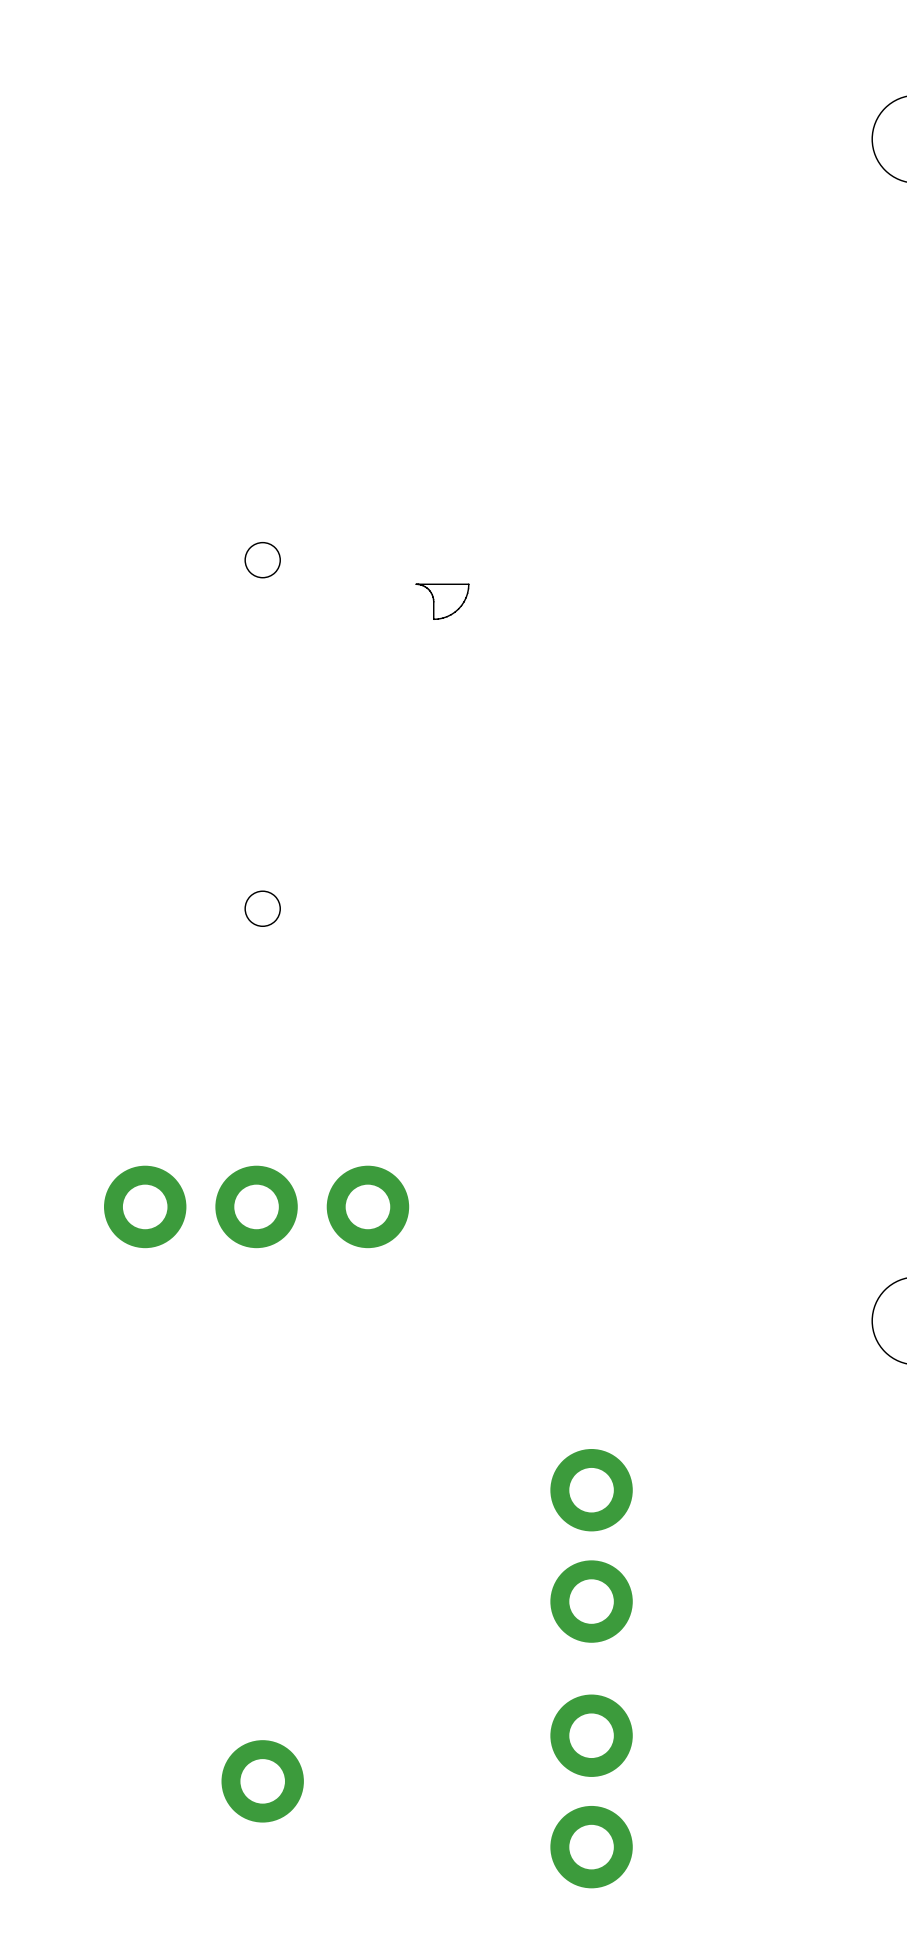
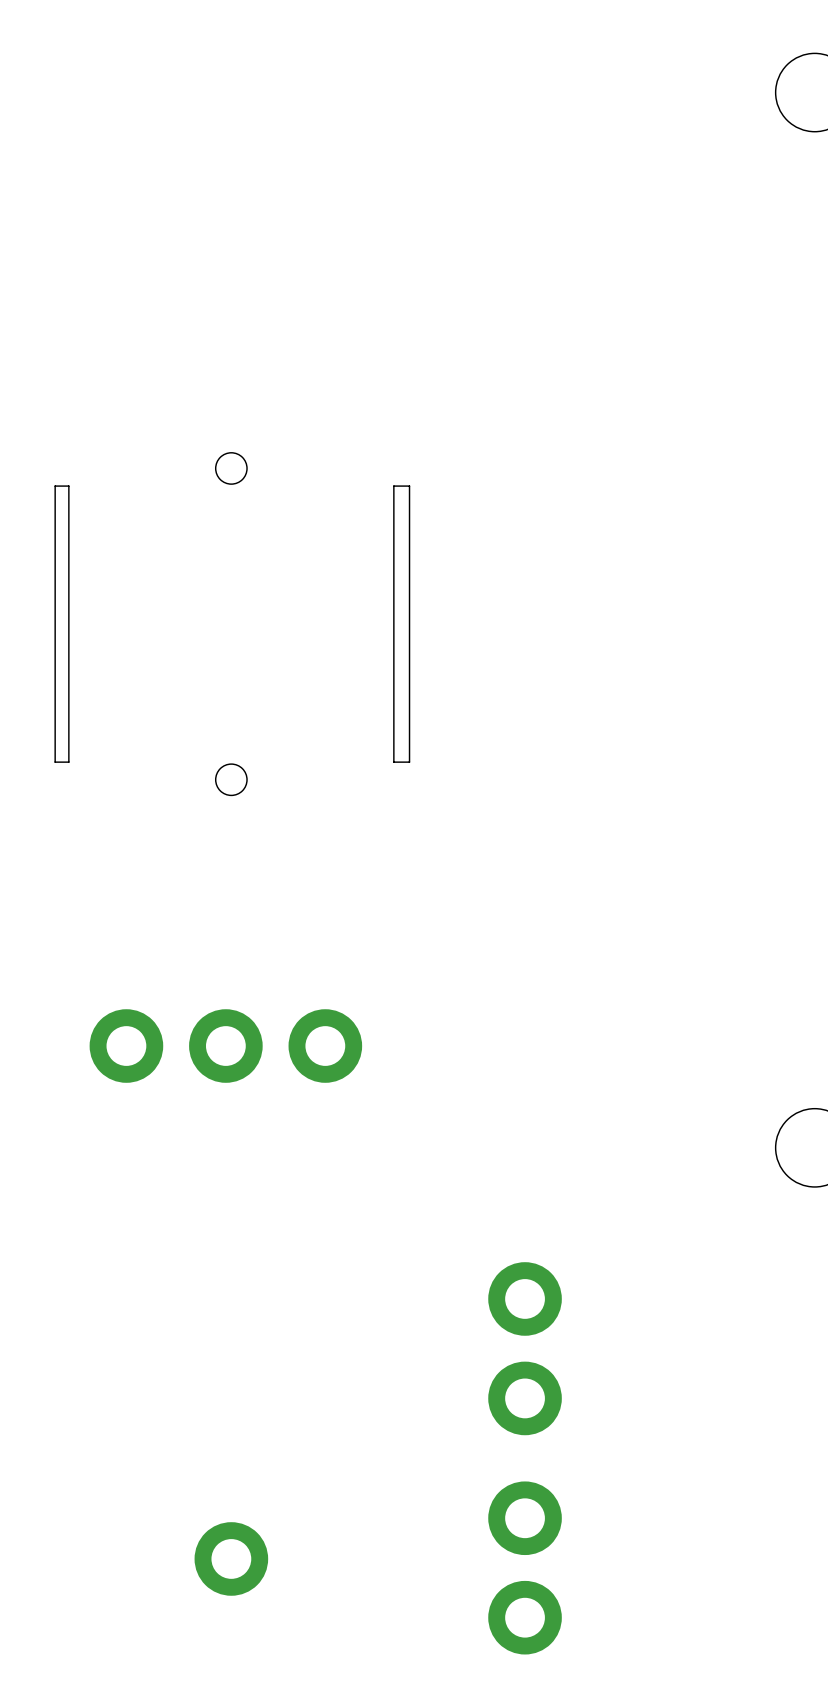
board edge: none -> (68, 486) (55, 486) (55, 762) (68, 762) (68, 486)
board edge: none -> (409, 486) (393, 486) (393, 762) (409, 762) (409, 486)
board edge: (468, 584) (466, 597) (458, 609) (447, 616) (433, 619) (433, 599) (431, 593) (424, 586) (416, 584) (468, 584) -> none

